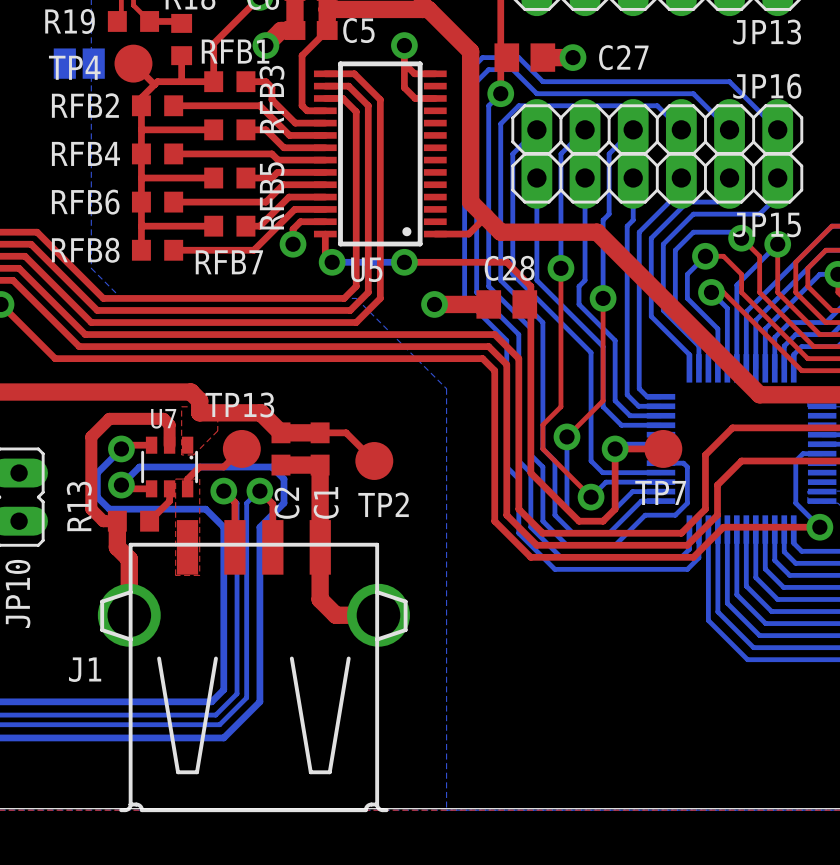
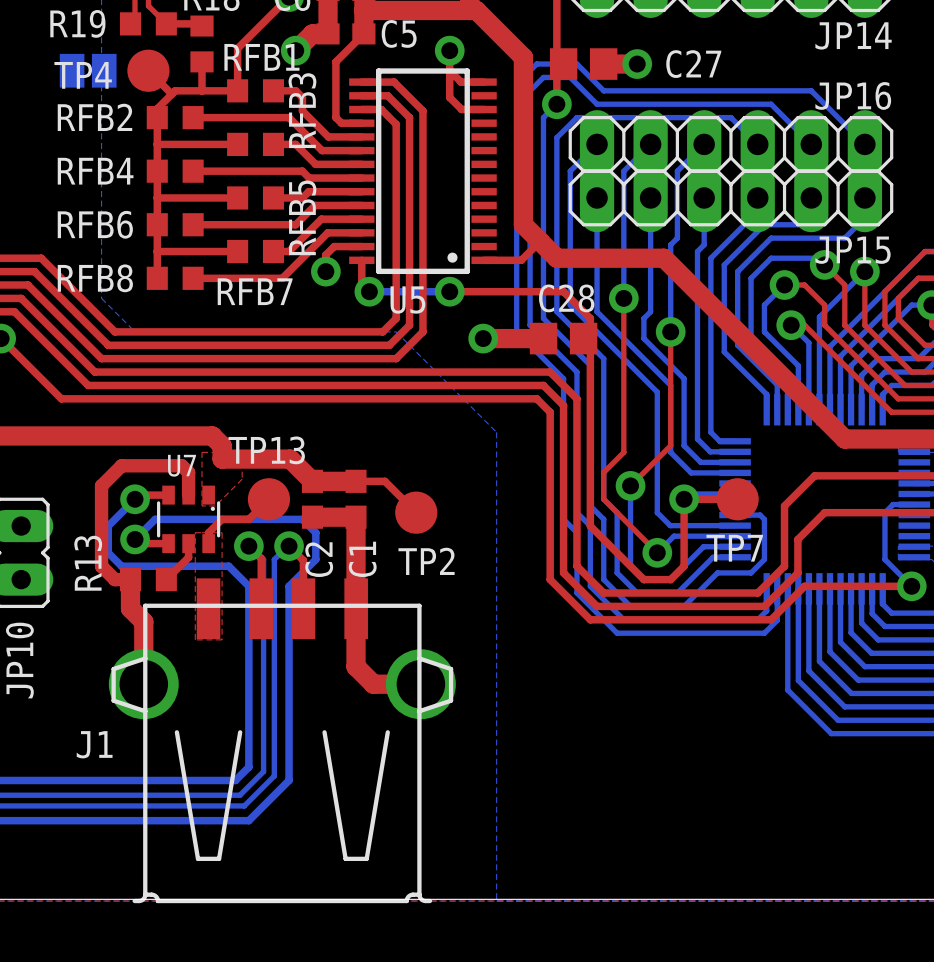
JP13 name: JP13 (767, 32) -> JP14 (853, 35)

